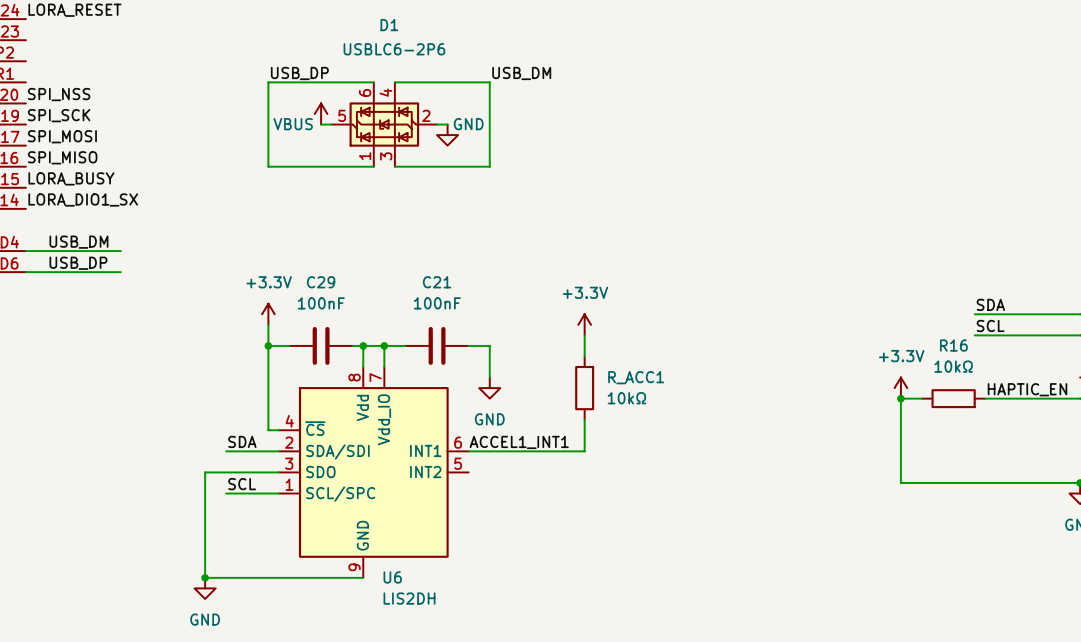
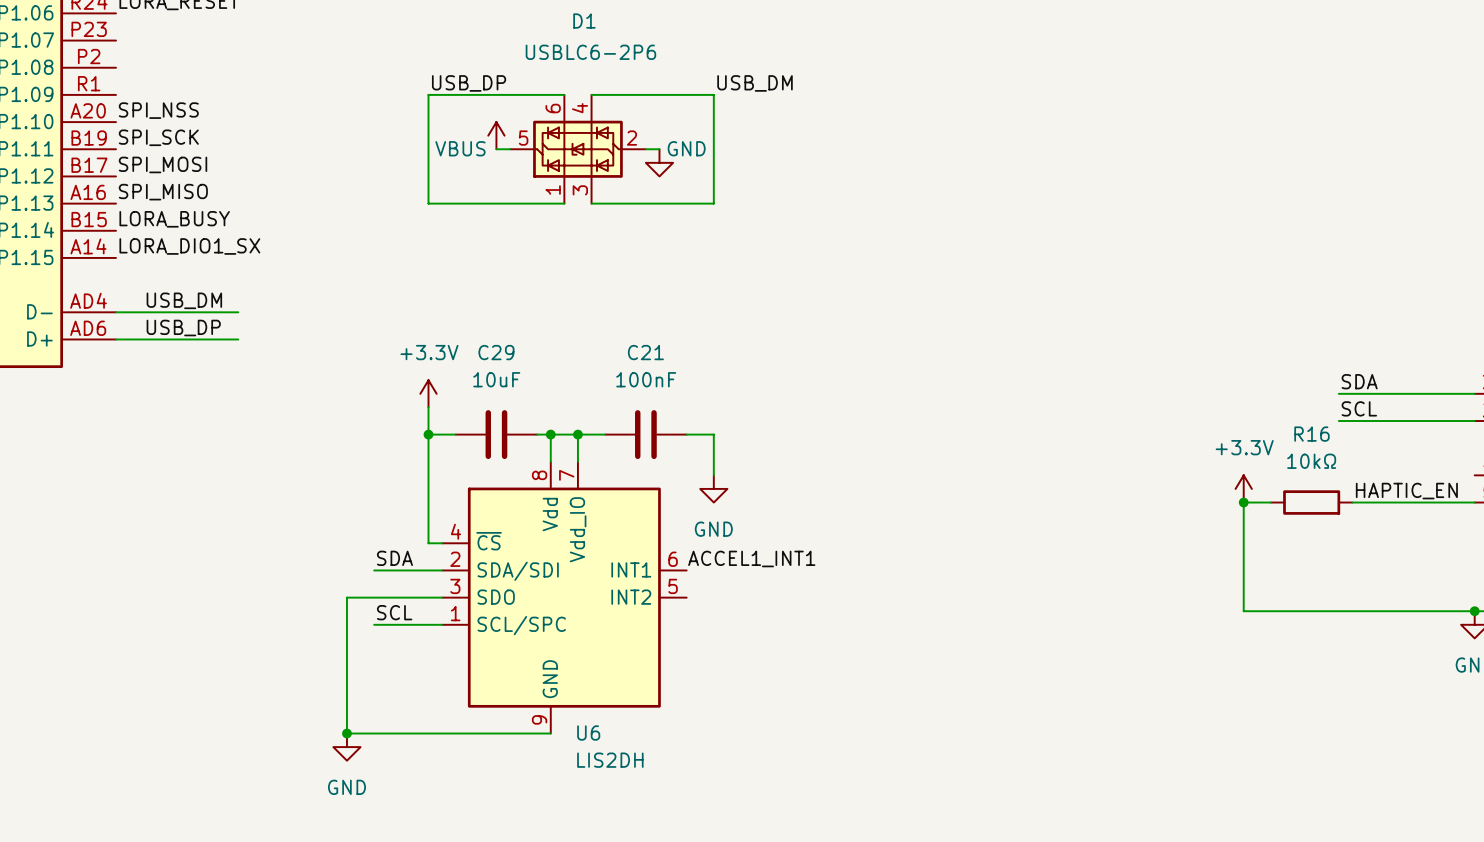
C29 value: 100nF (321, 303) -> 10uF (496, 379)
power symbol: +3.3V (584, 324) -> none
wire: (584, 335) (584, 356) -> none
R_ACC1: 10kΩ (584, 388) -> none
wire: (584, 419) (584, 451) (468, 451) -> none

